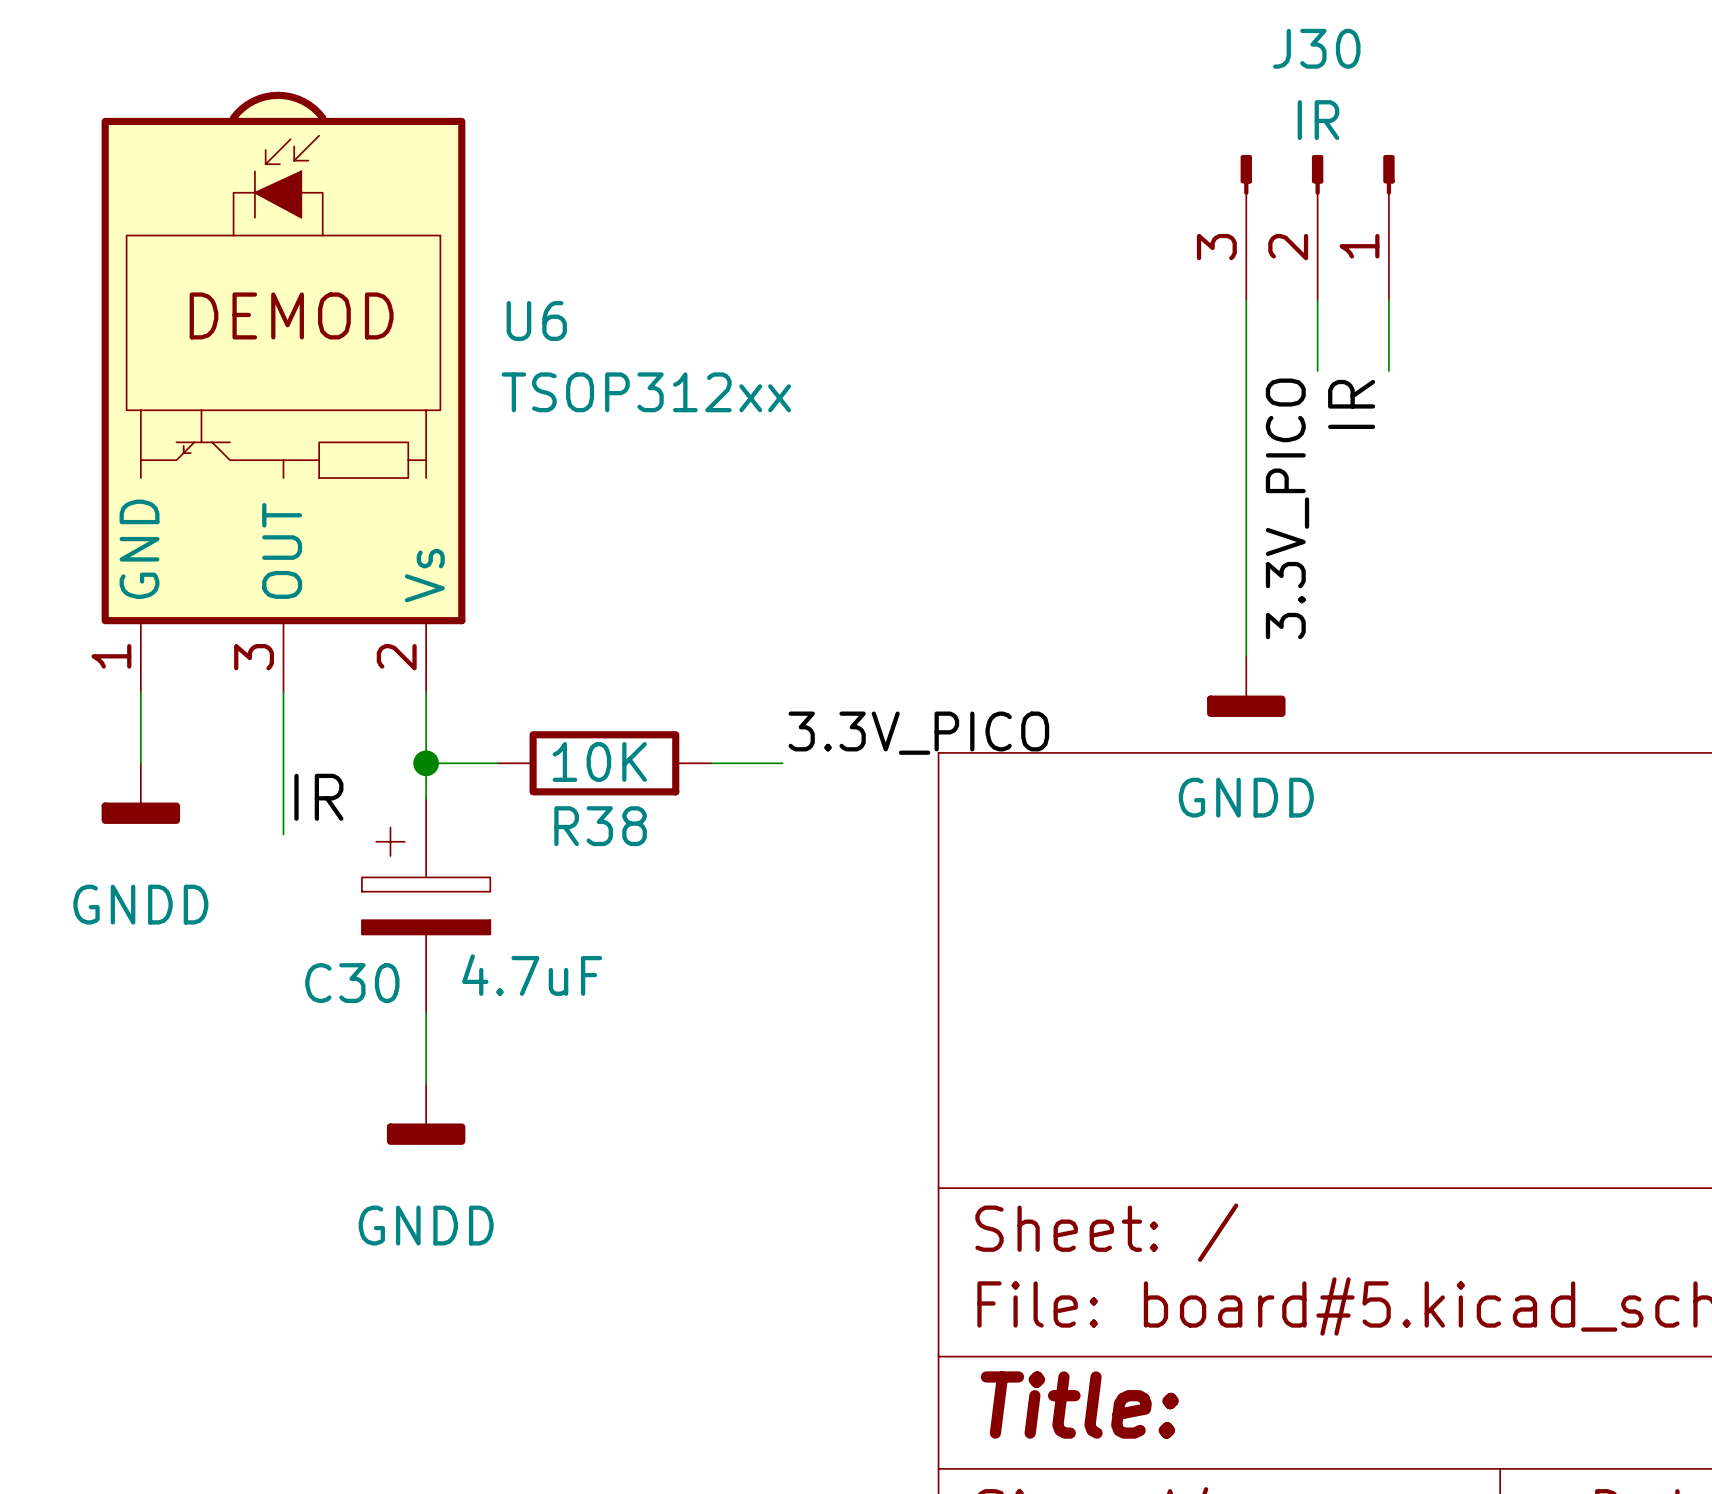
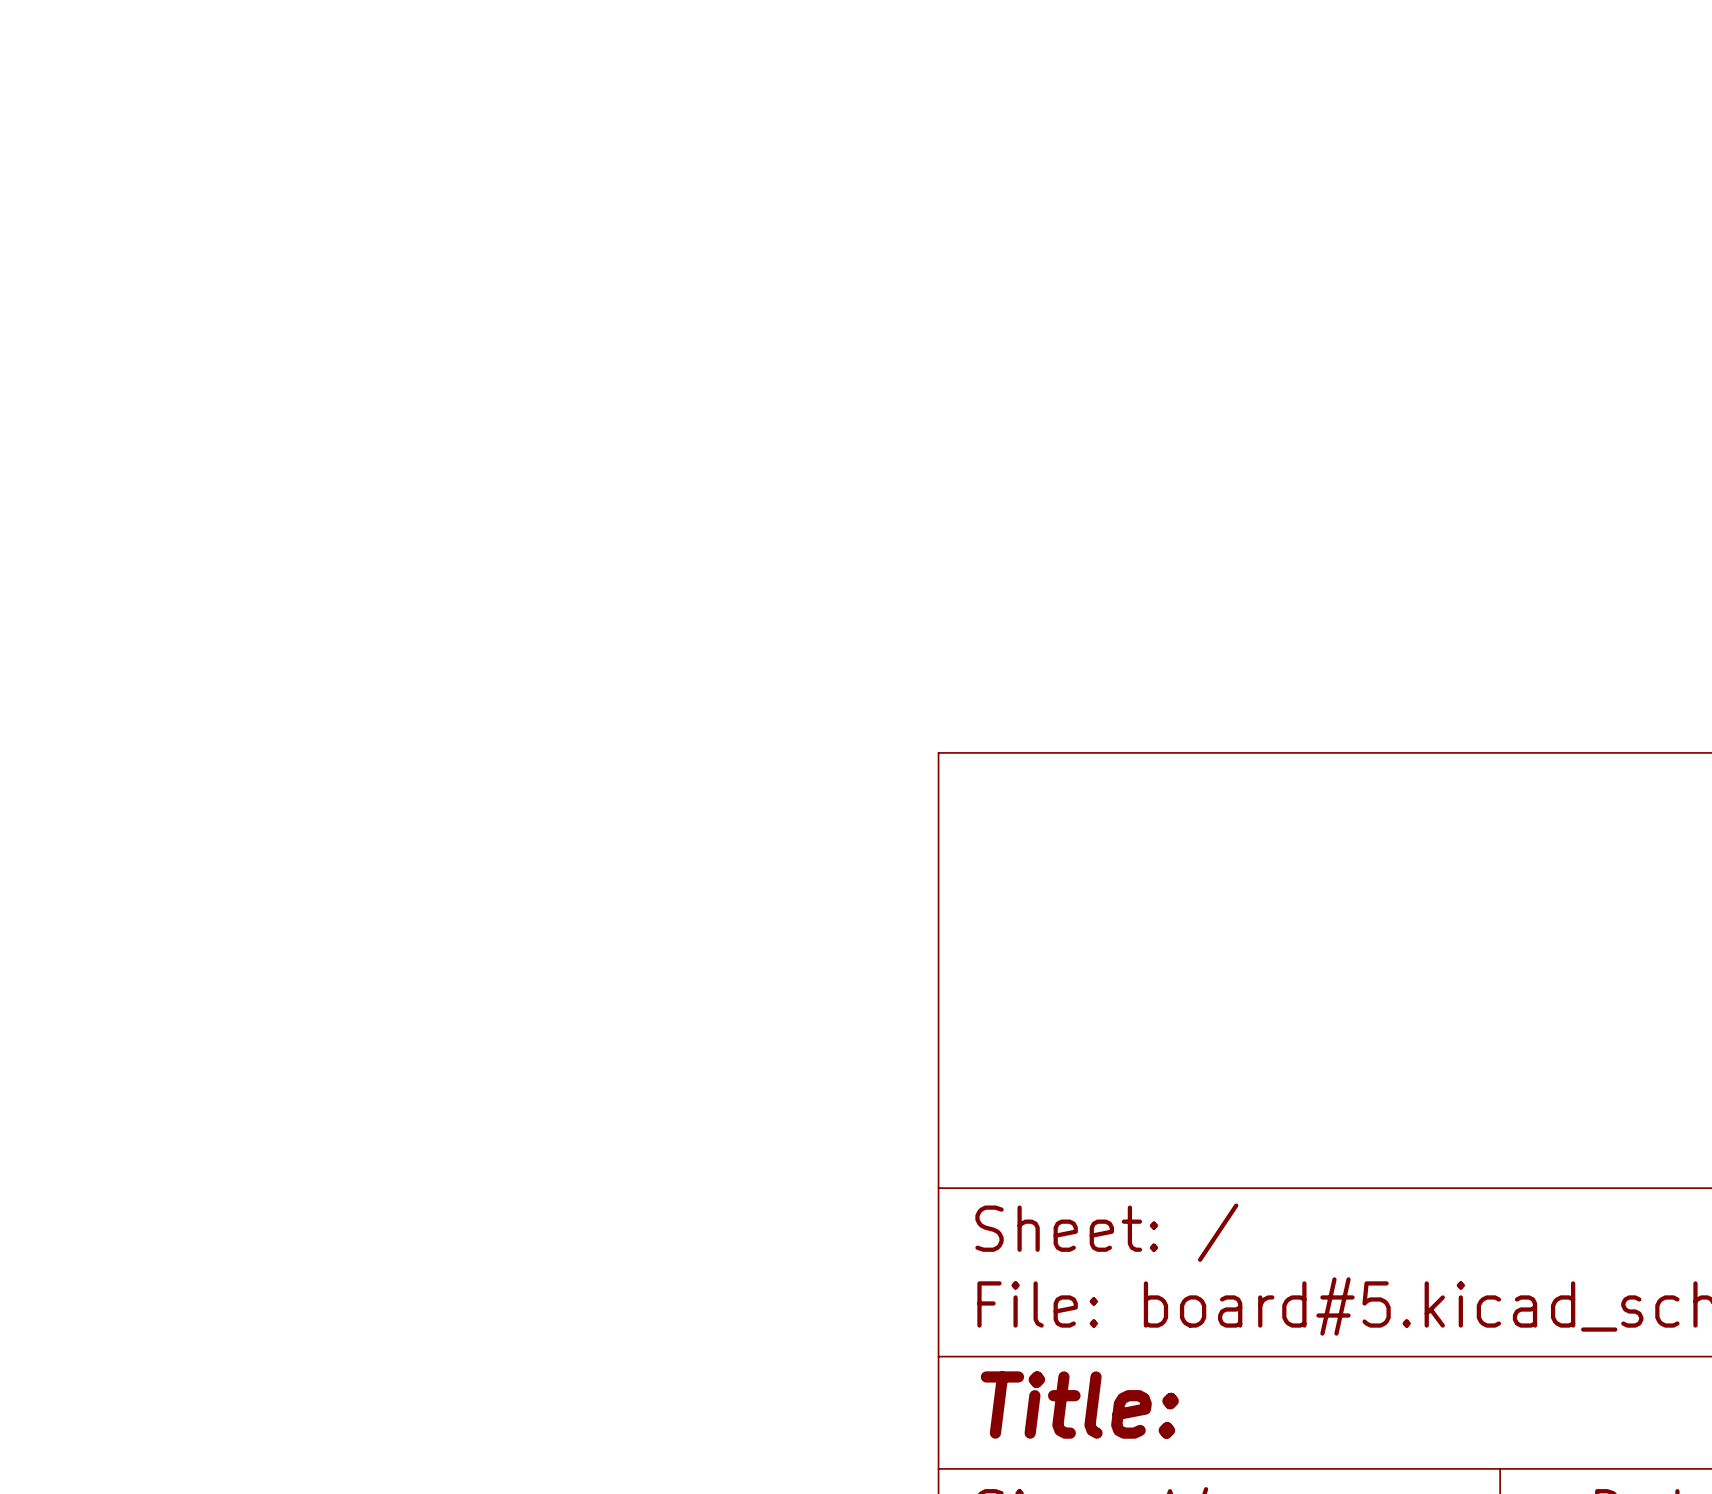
J30: IR (1317, 227) -> none
wire: (1246, 299) (1246, 656) -> none
wire: (1317, 299) (1317, 371) -> none
wire: (1388, 299) (1388, 371) -> none
U6: TSOP312xx (283, 391) -> none
label: IR (1351, 404) -> none
label: 3.3V_PICO (1287, 508) -> none
power symbol: GNDD (1246, 686) -> none
wire: (140, 691) (140, 763) -> none
wire: (283, 691) (283, 834) -> none
wire: (426, 691) (426, 798) -> none
label: 3.3V_PICO (918, 733) -> none
wire: (426, 763) (497, 763) -> none
junction: (426, 763) -> none
R38: 10K (604, 763) -> none
wire: (711, 763) (782, 763) -> none
power symbol: GNDD (140, 793) -> none
label: IR (318, 797) -> none
C30: 4.7uF (426, 905) -> none
wire: (426, 1012) (426, 1084) -> none
power symbol: GNDD (426, 1114) -> none

